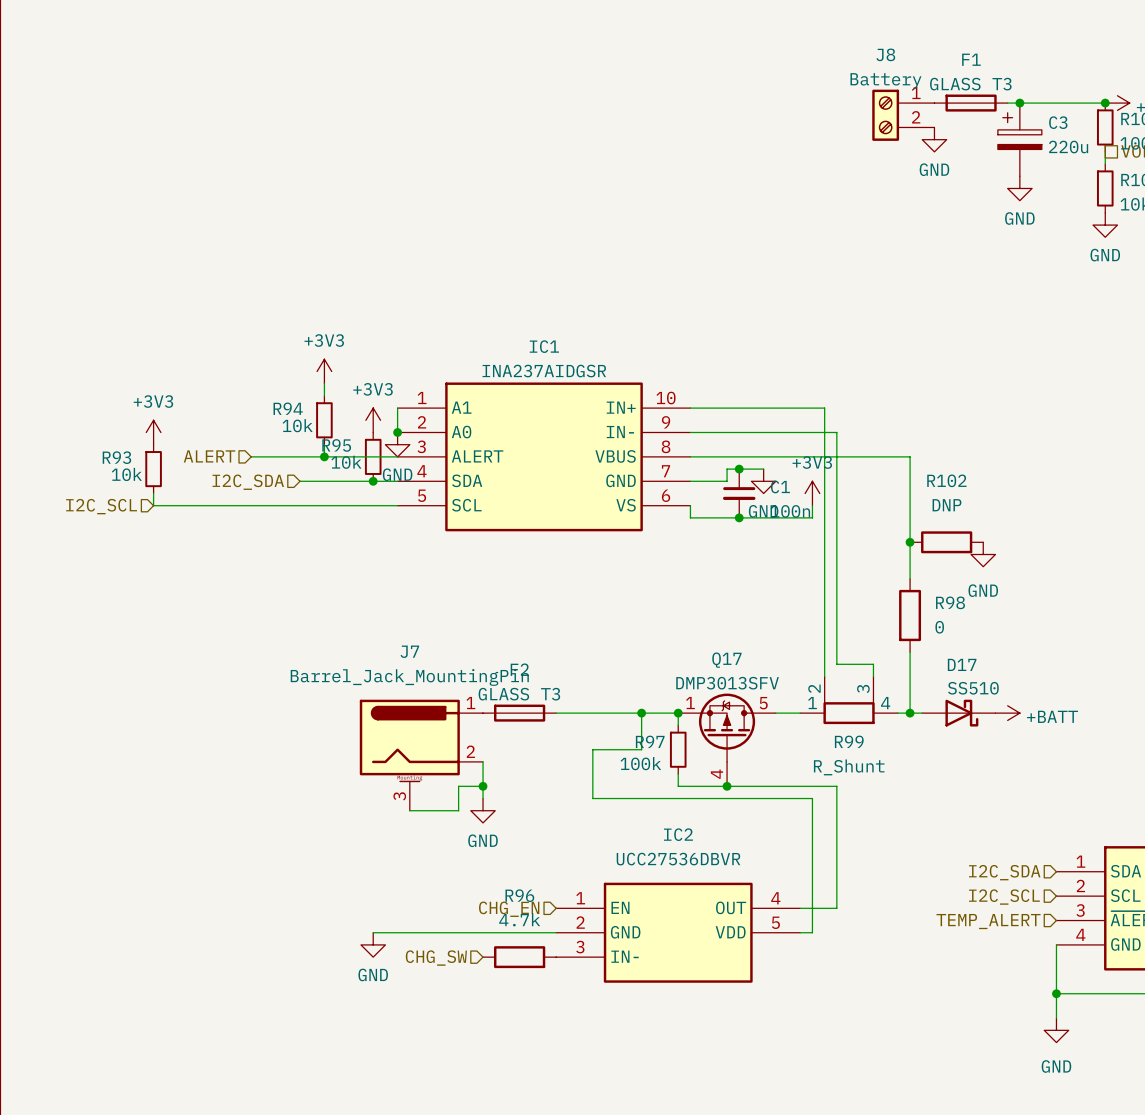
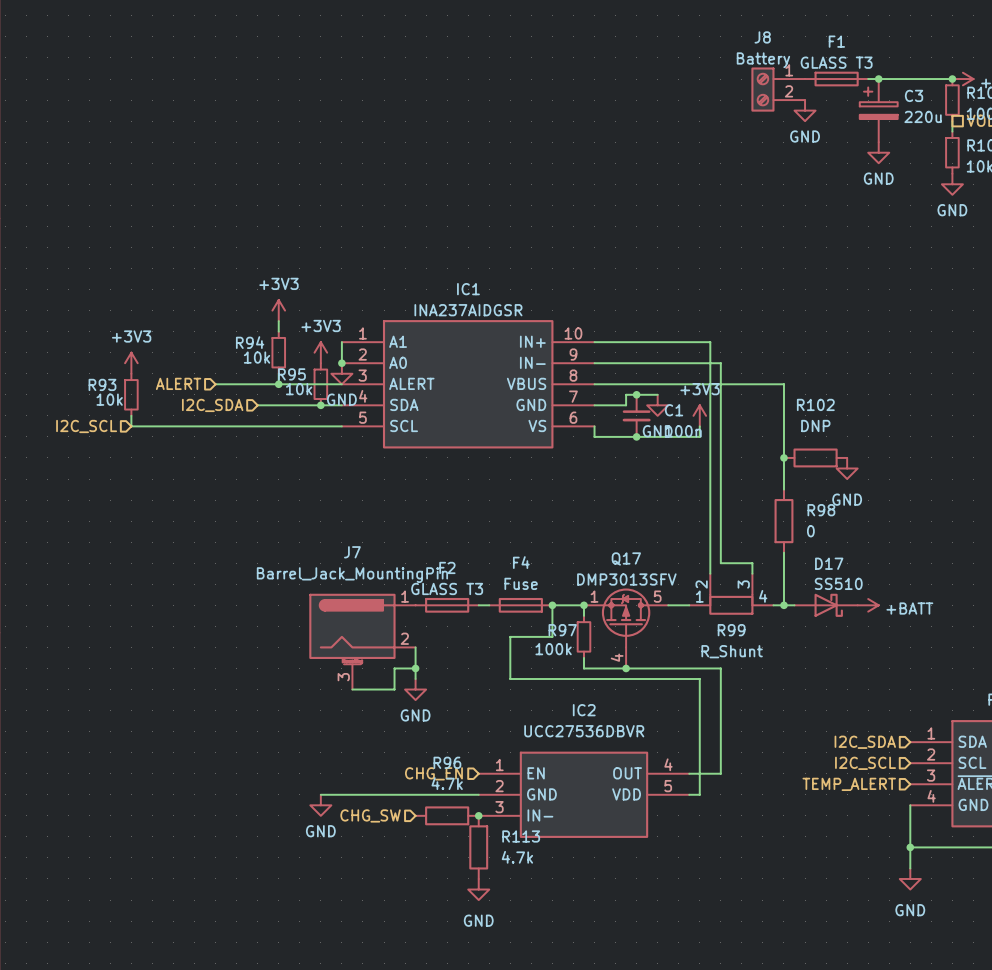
F4: none -> Fuse (520, 605)
junction: none -> (478, 815)
R113: none -> 4.7k (478, 847)
power symbol: none -> GND (478, 889)

